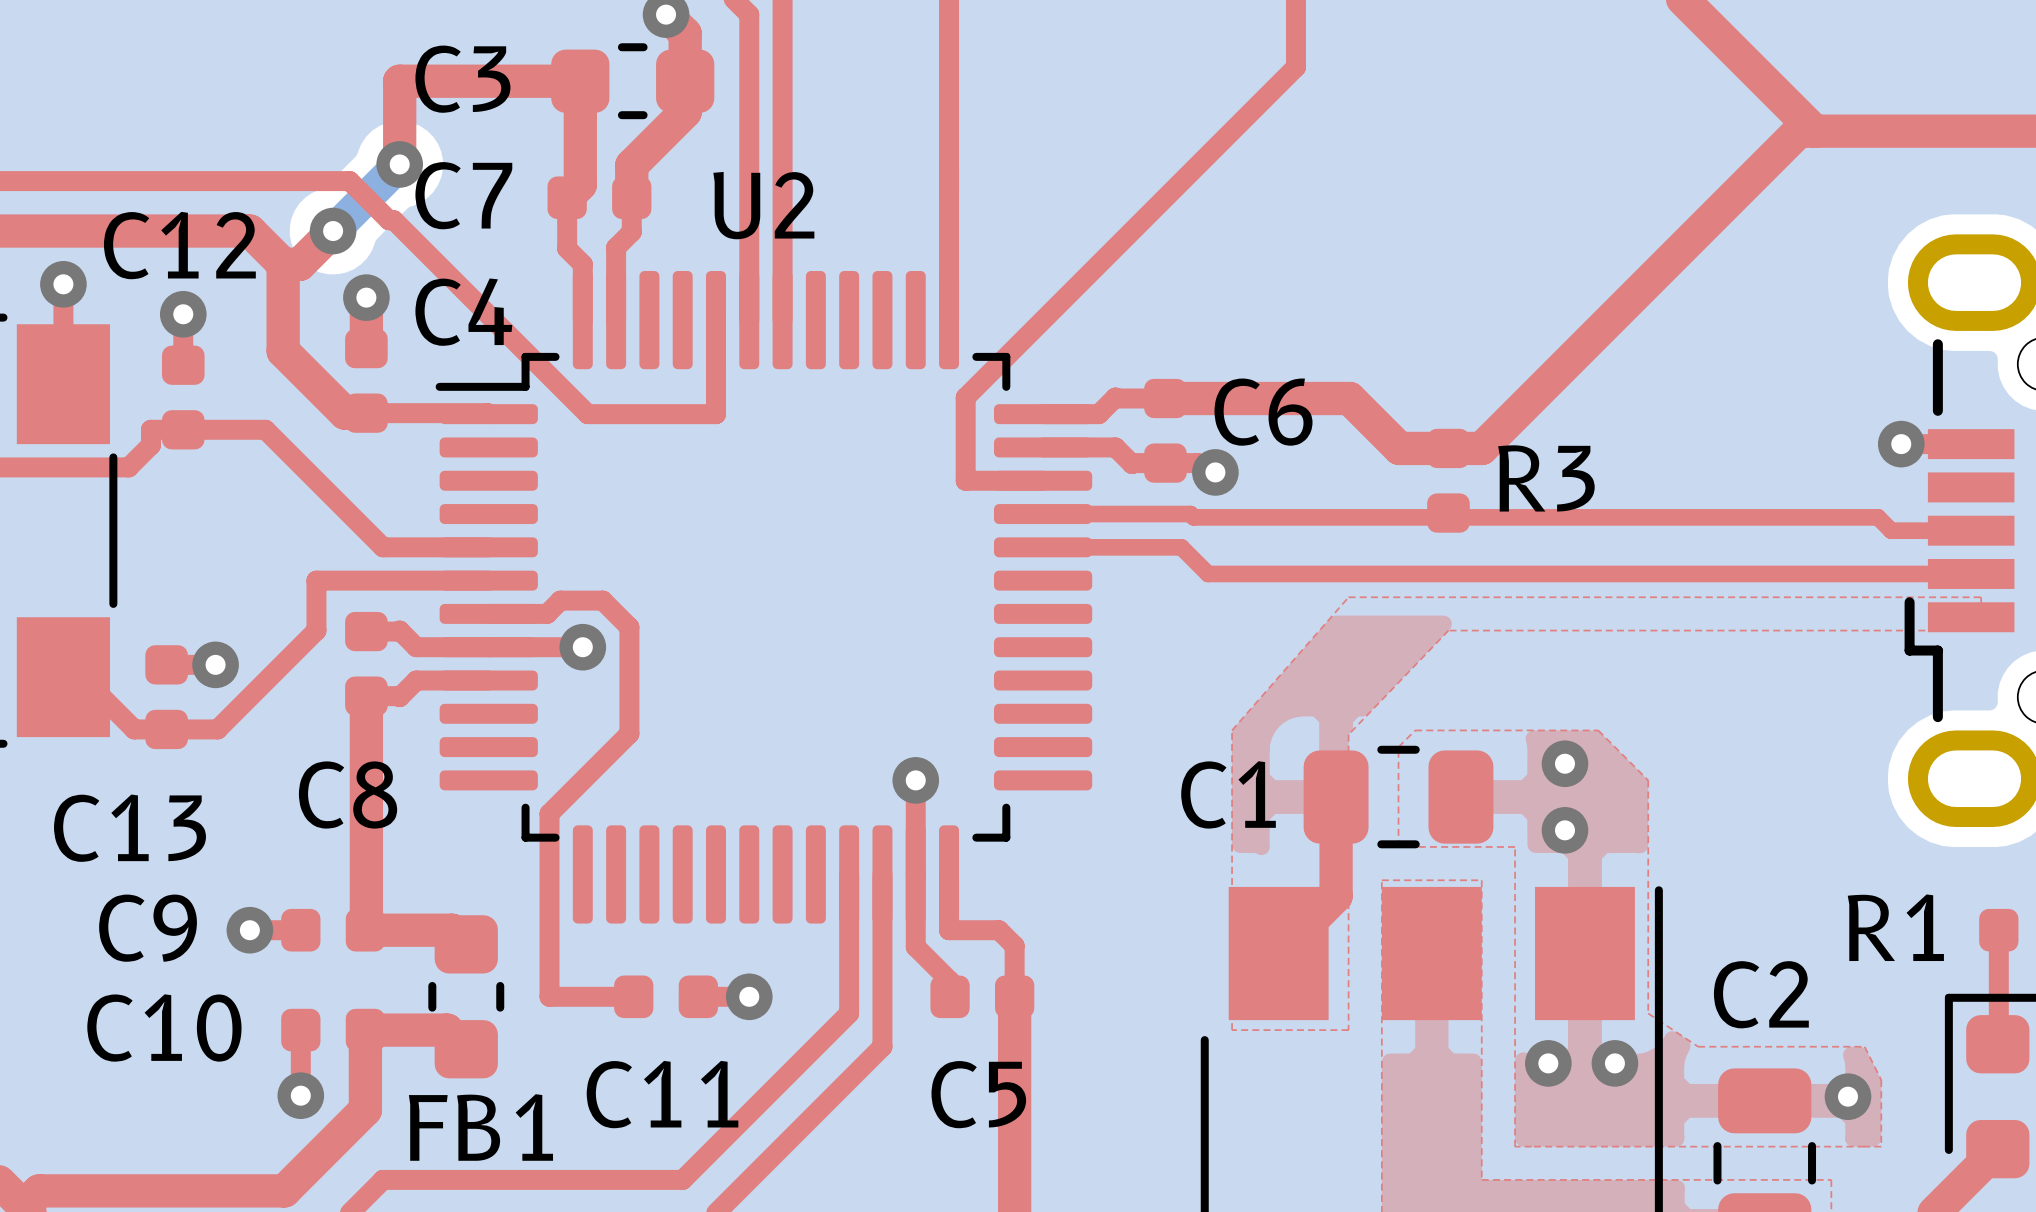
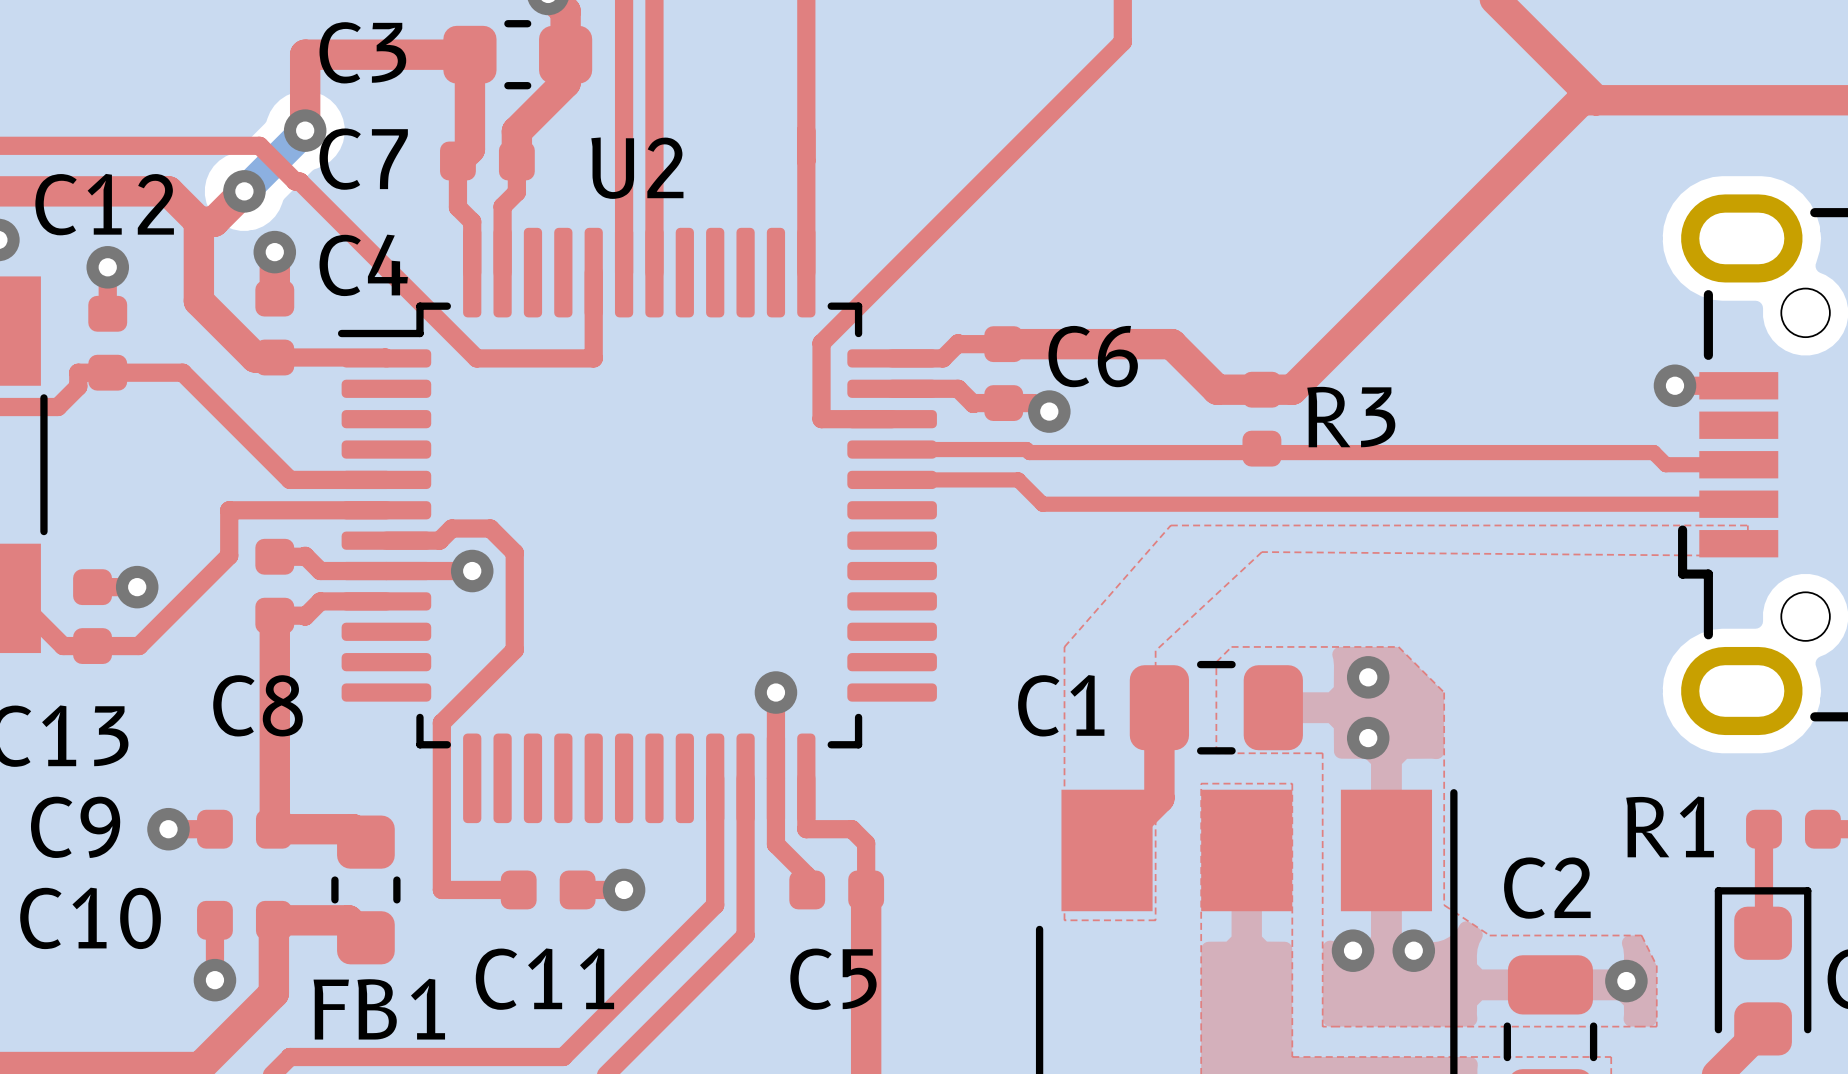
top zone outline: (1981, 630) (1448, 630) (1348, 734) (1348, 1030) (1331, 1030) -> (1747, 555) (1261, 552) (1155, 650) (1155, 920)

